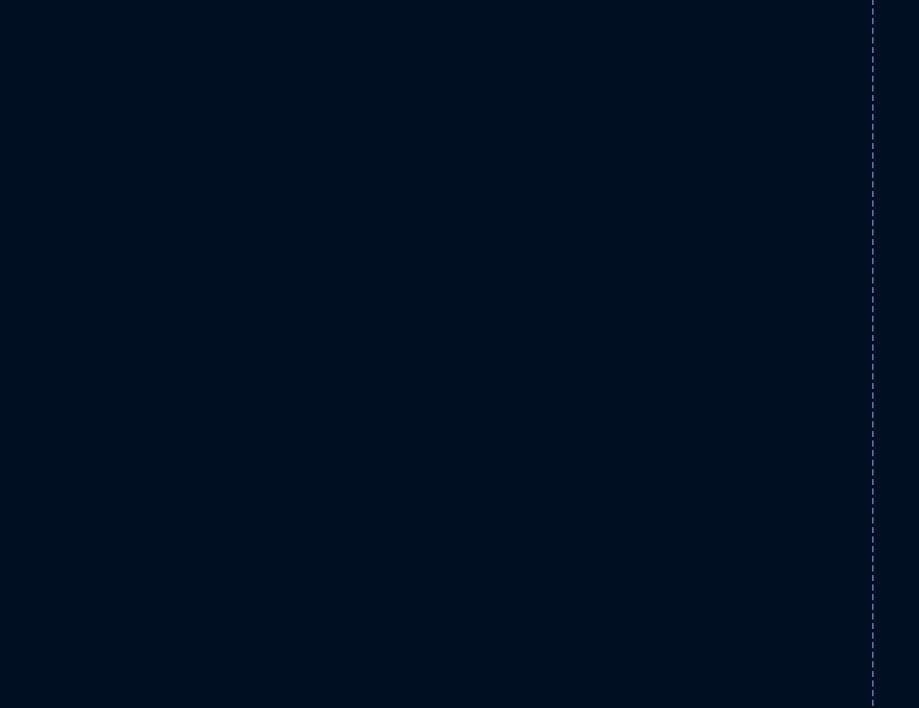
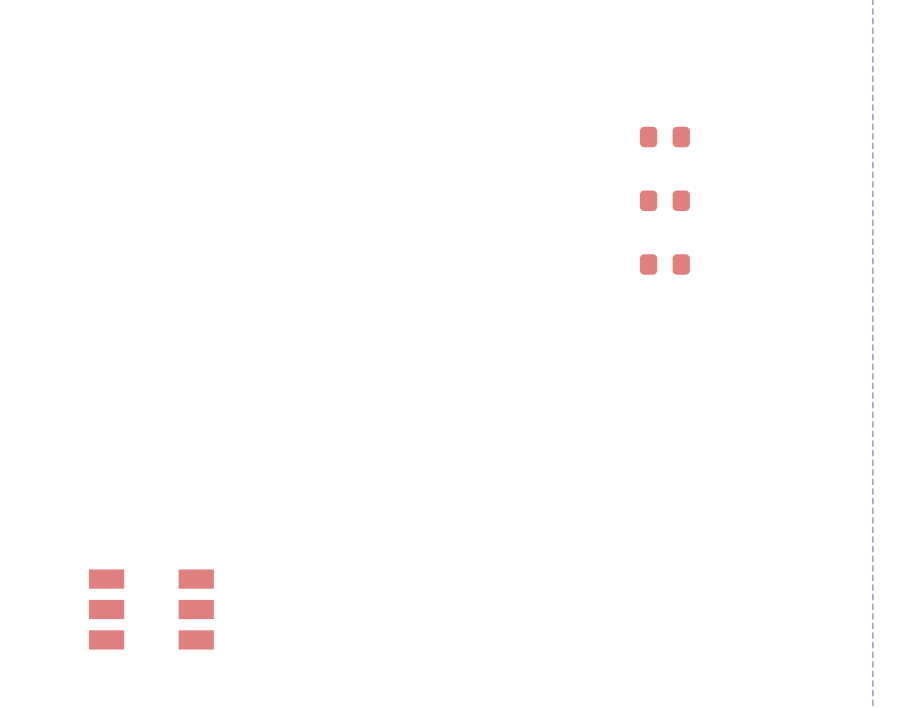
part: none -> (664, 136)
part: none -> (664, 200)
part: none -> (664, 264)
part: none -> (151, 609)

